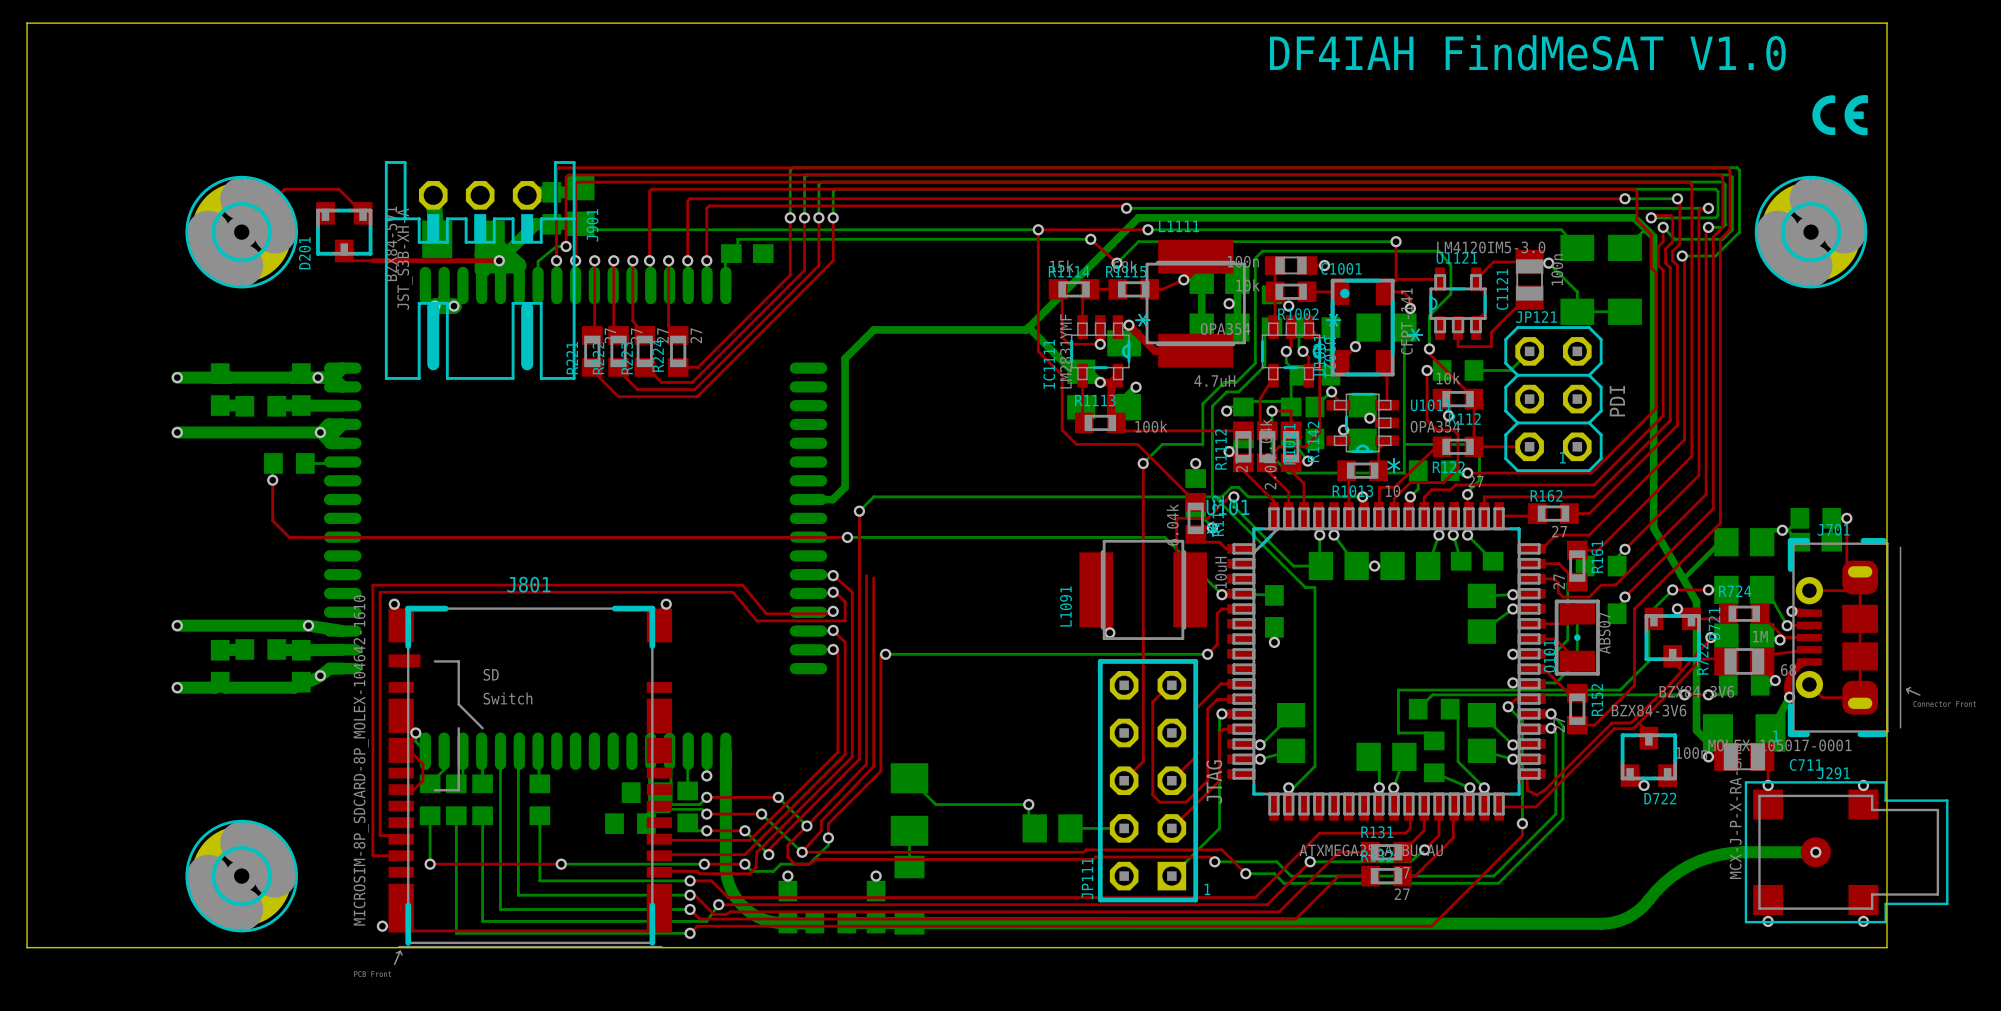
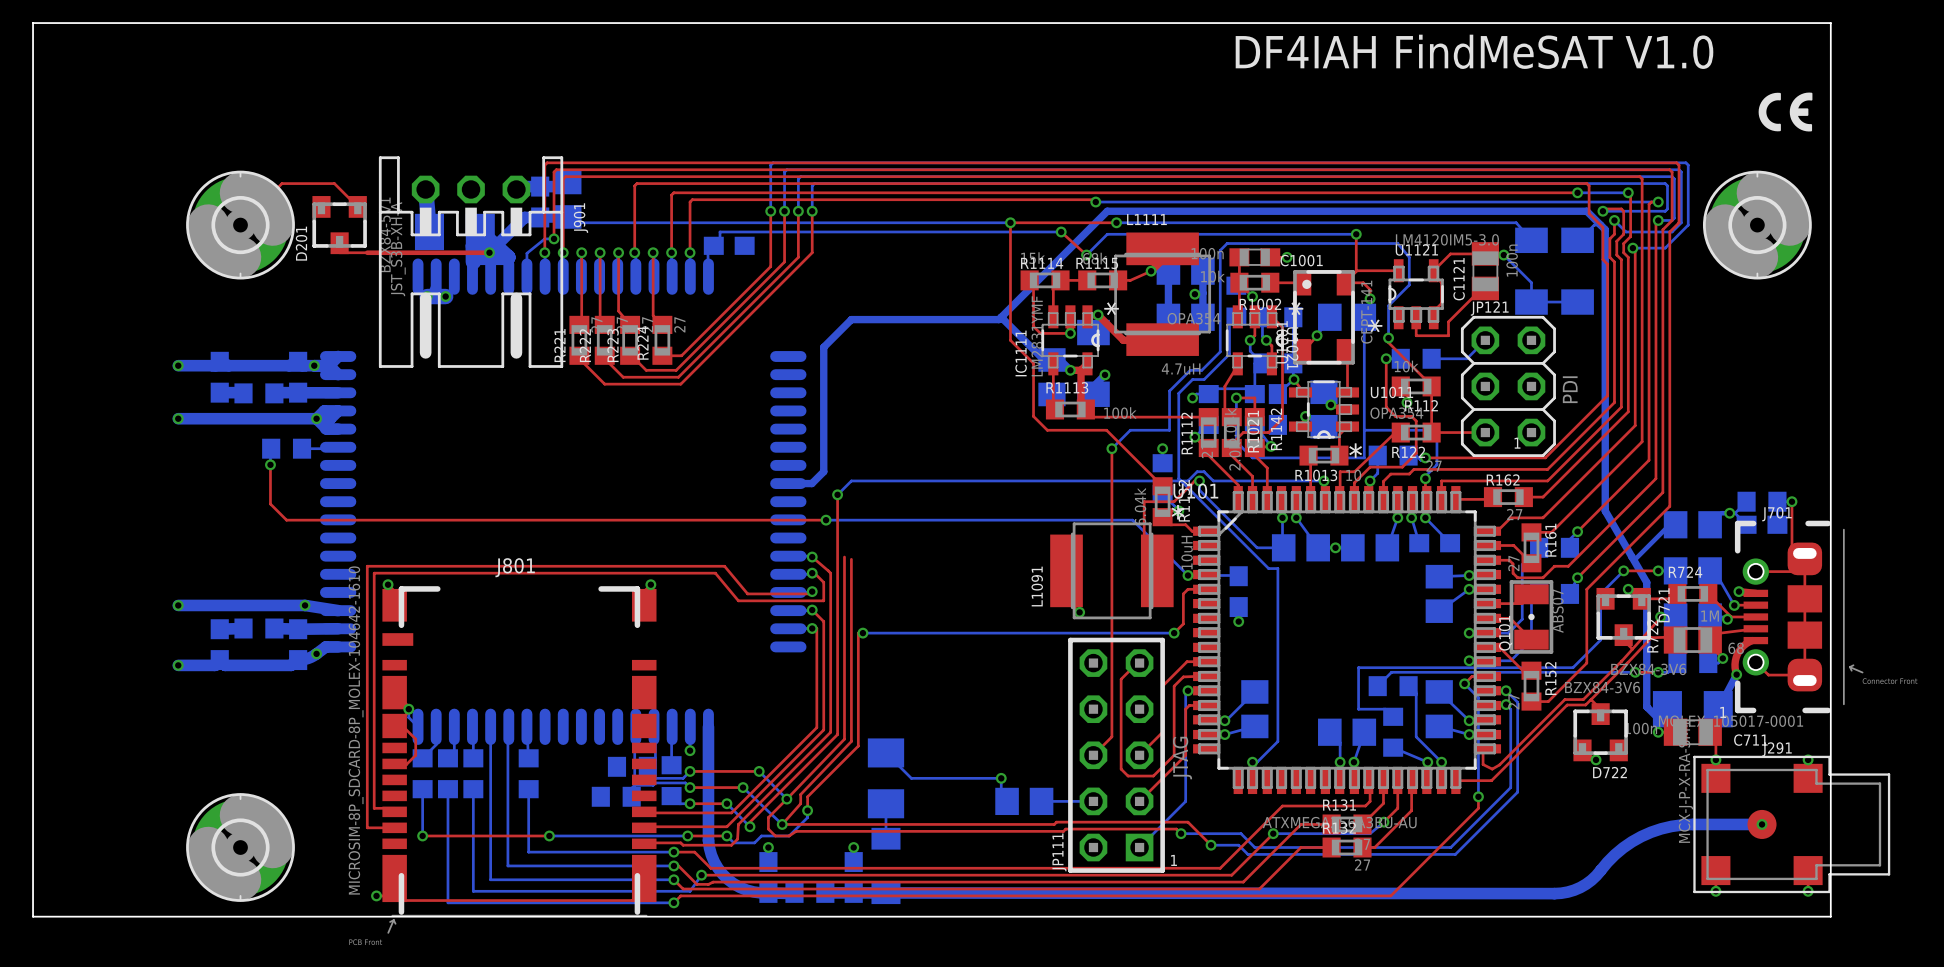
J701 footprint: [1787, 538, 1921, 738] -> [1734, 520, 1864, 714]
J801 footprint: [388, 605, 673, 966] -> [382, 586, 657, 934]

